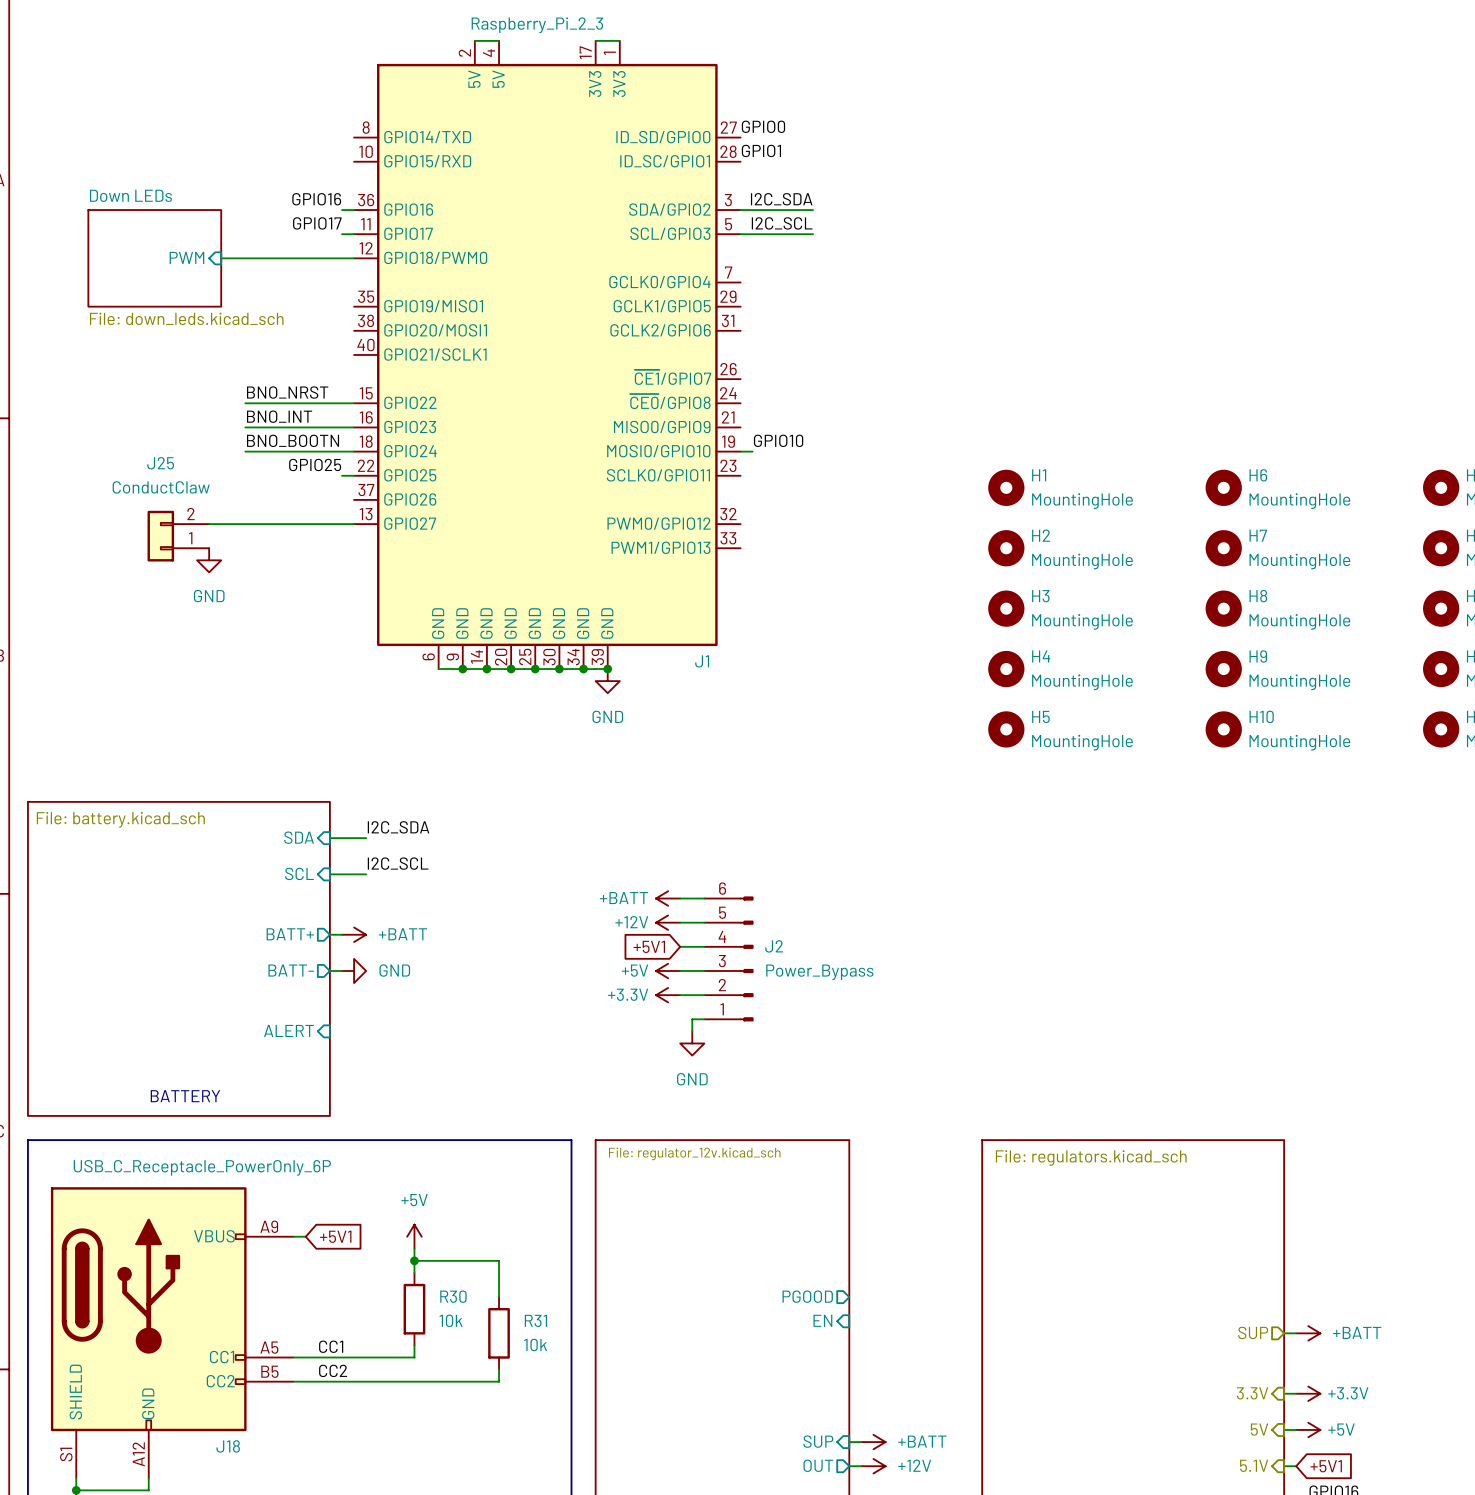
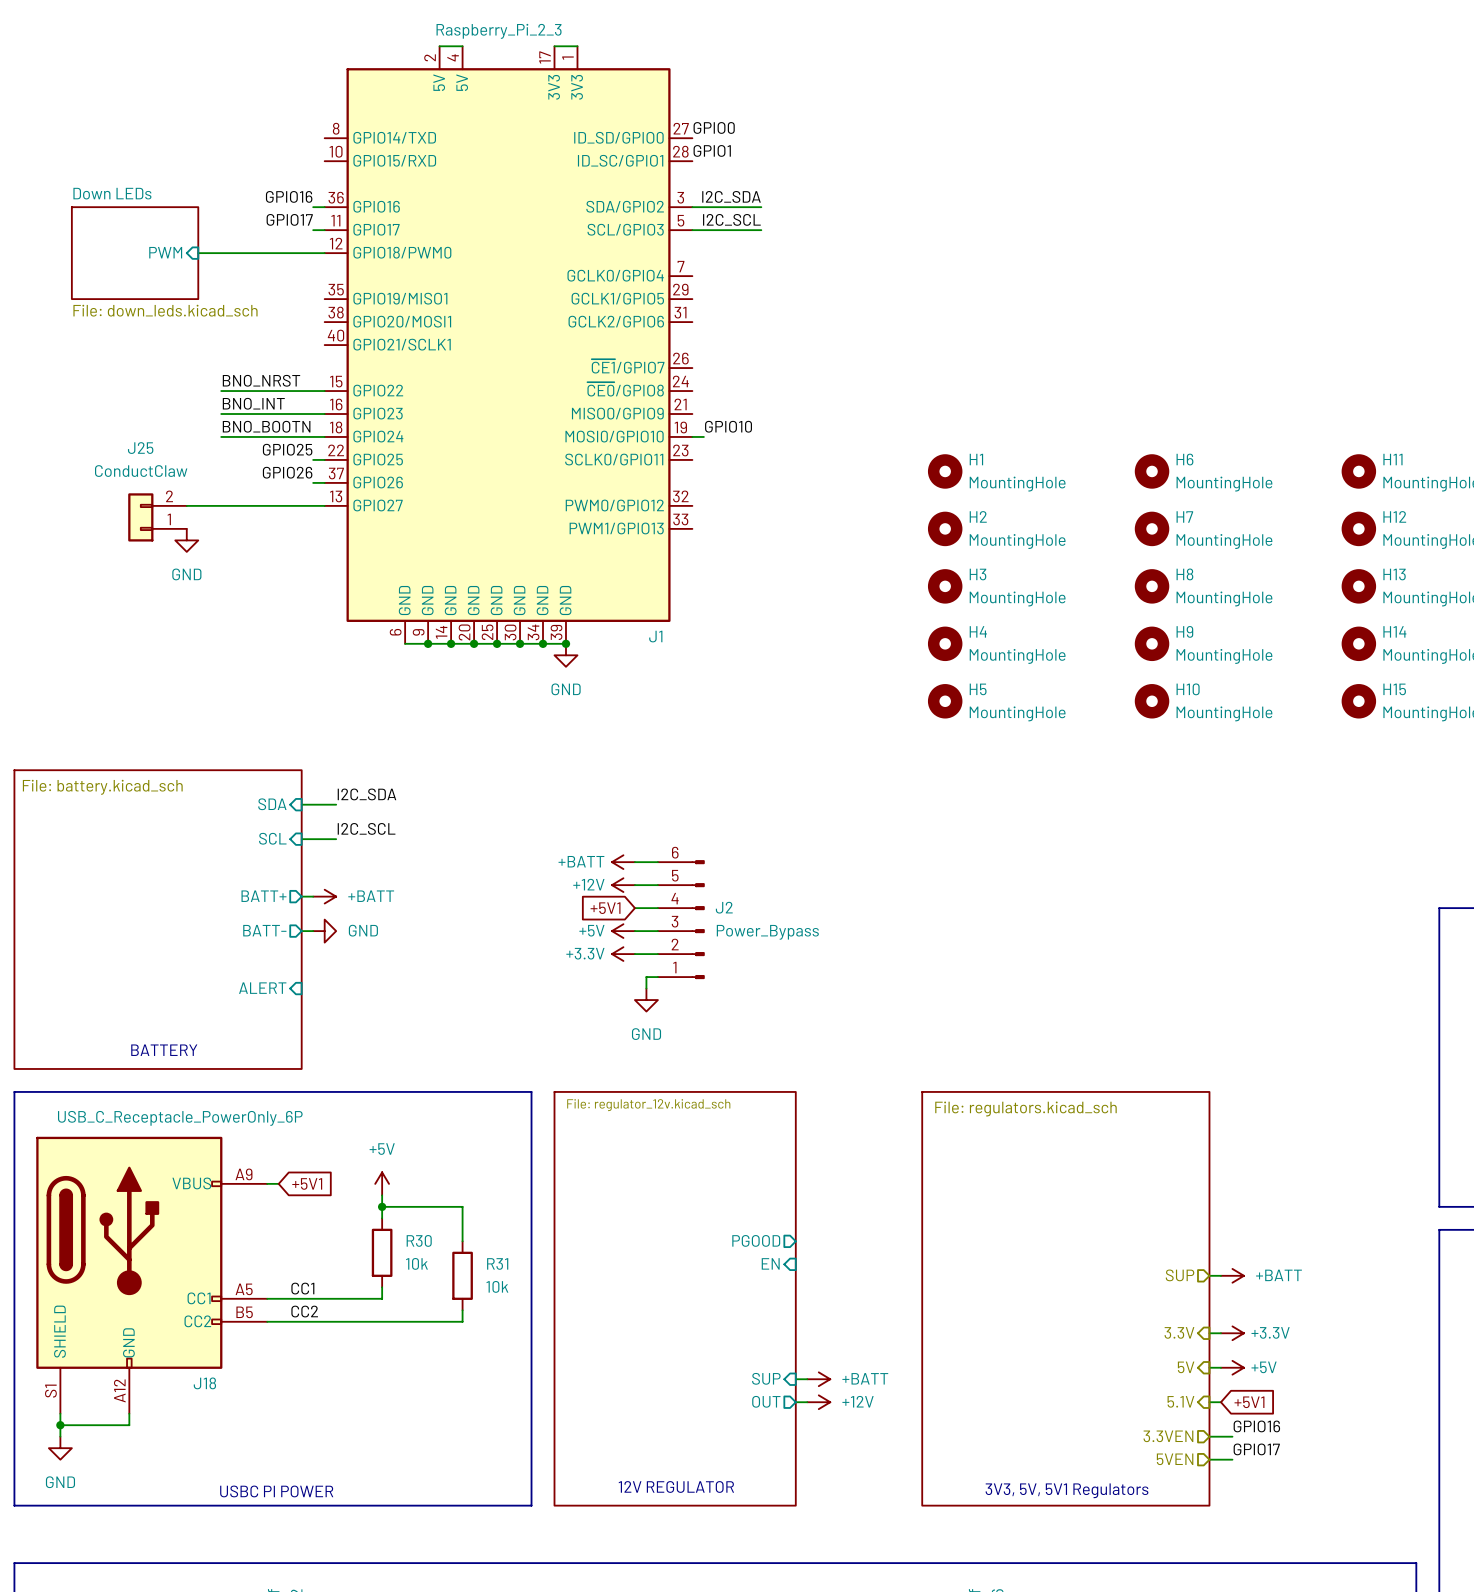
label: none -> GPIO26 (287, 472)
wire: none -> (313, 482) (324, 482)

